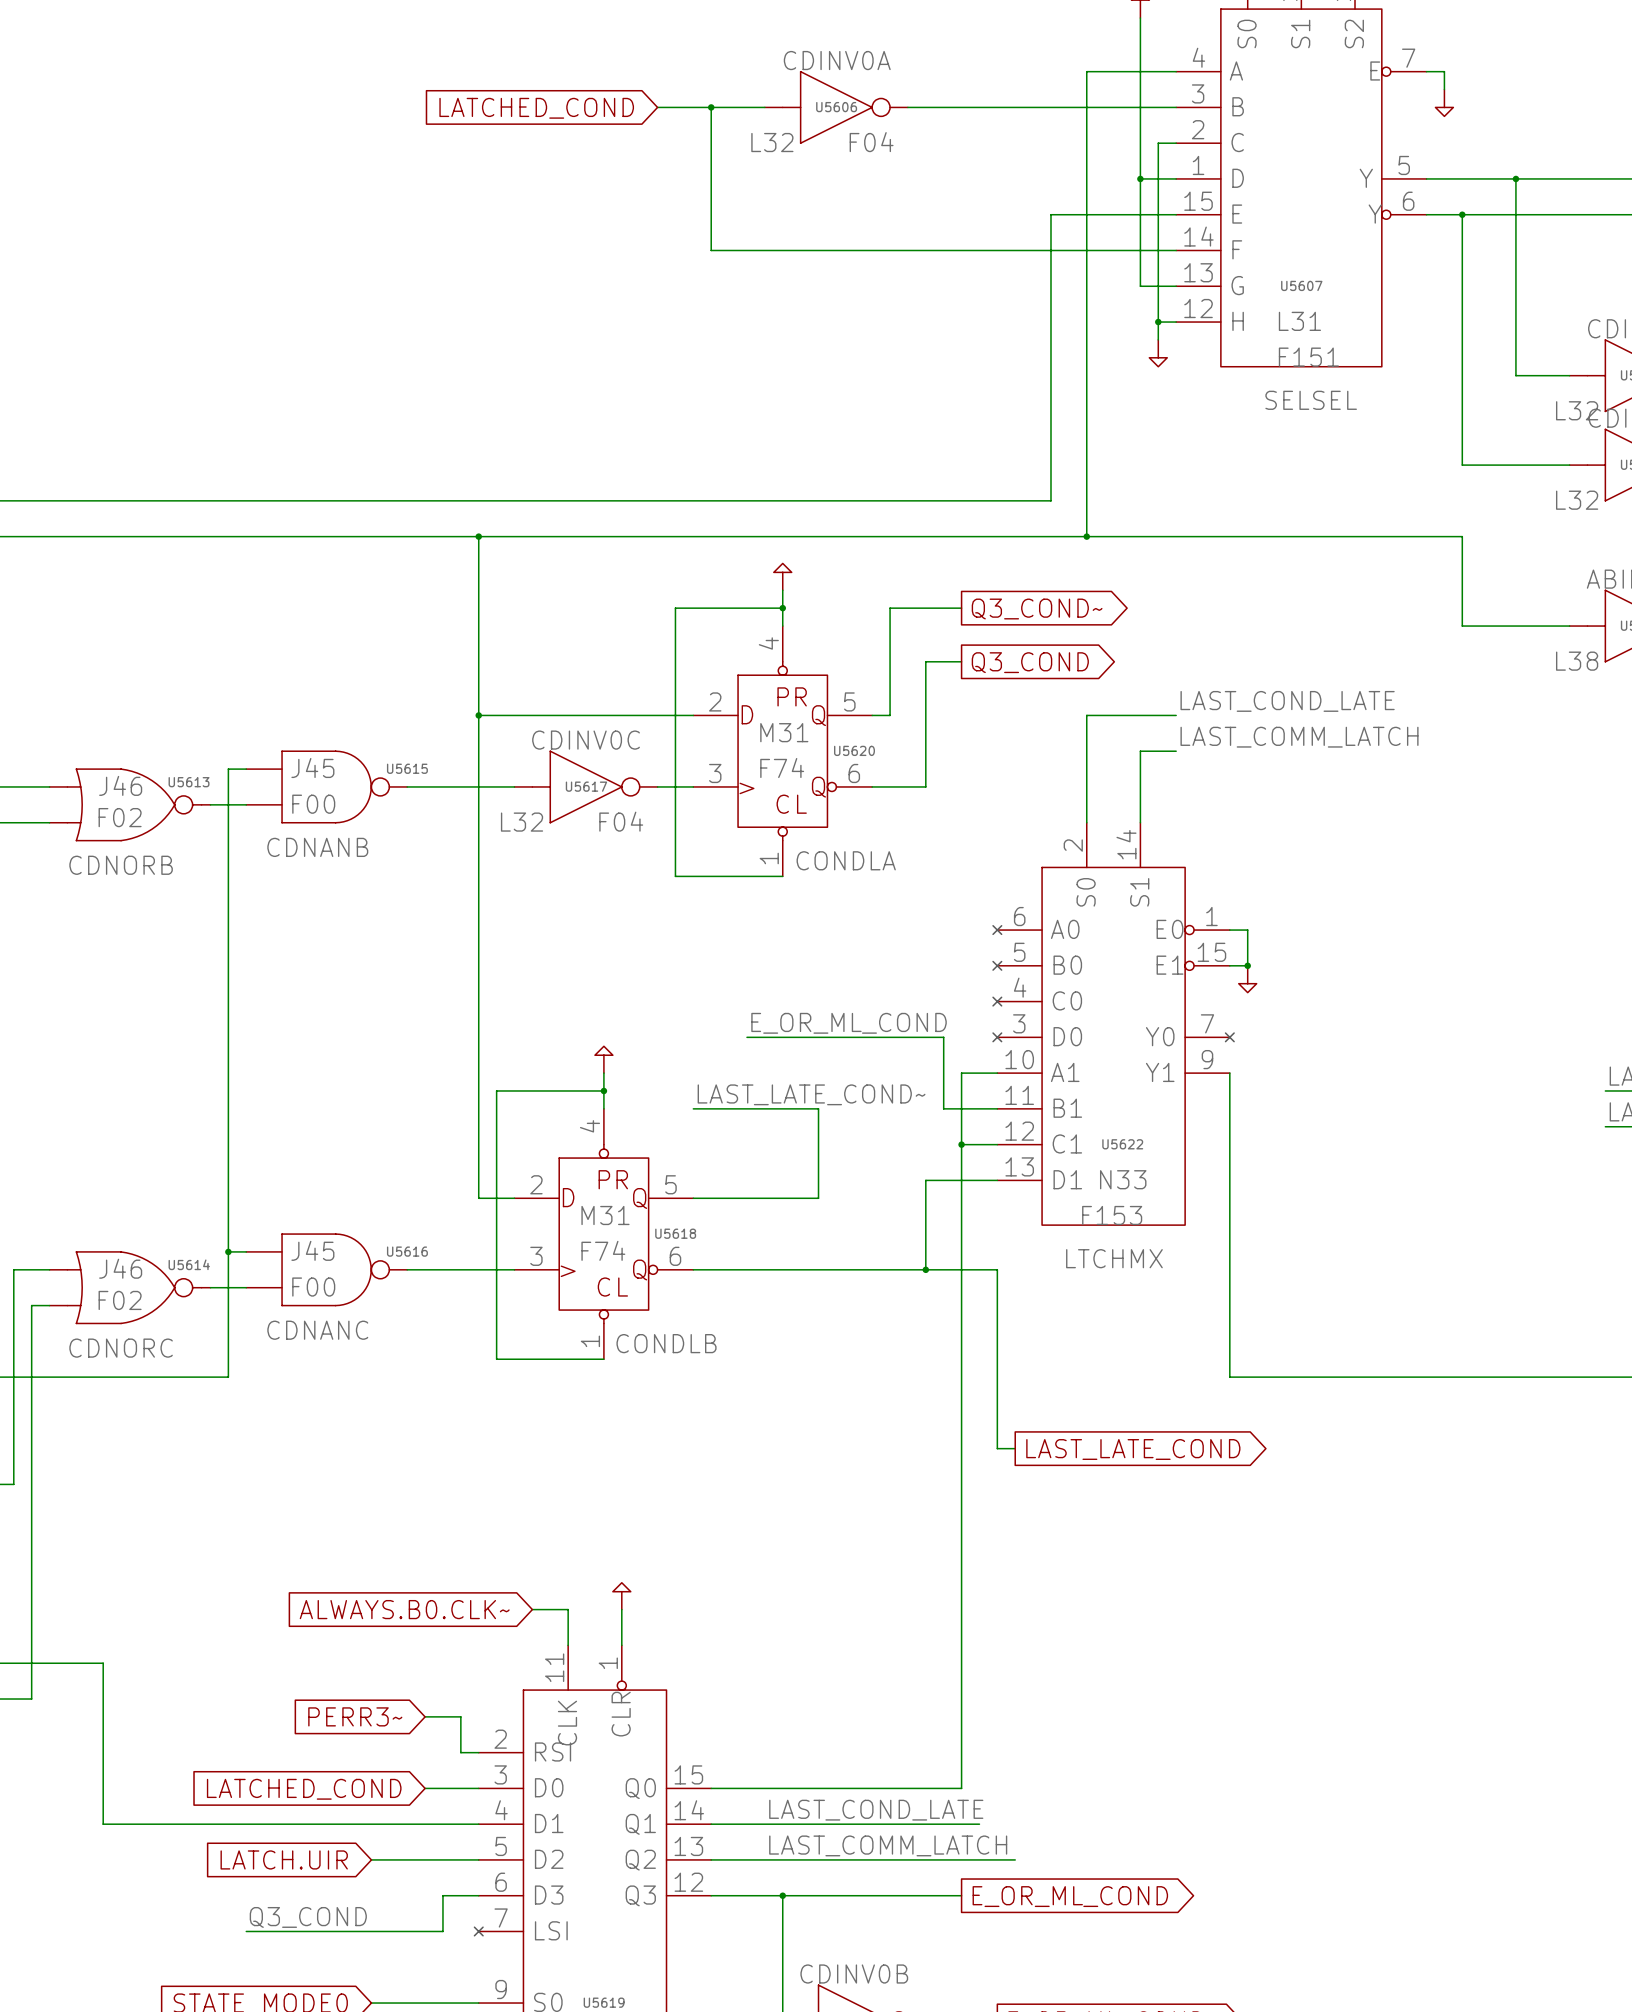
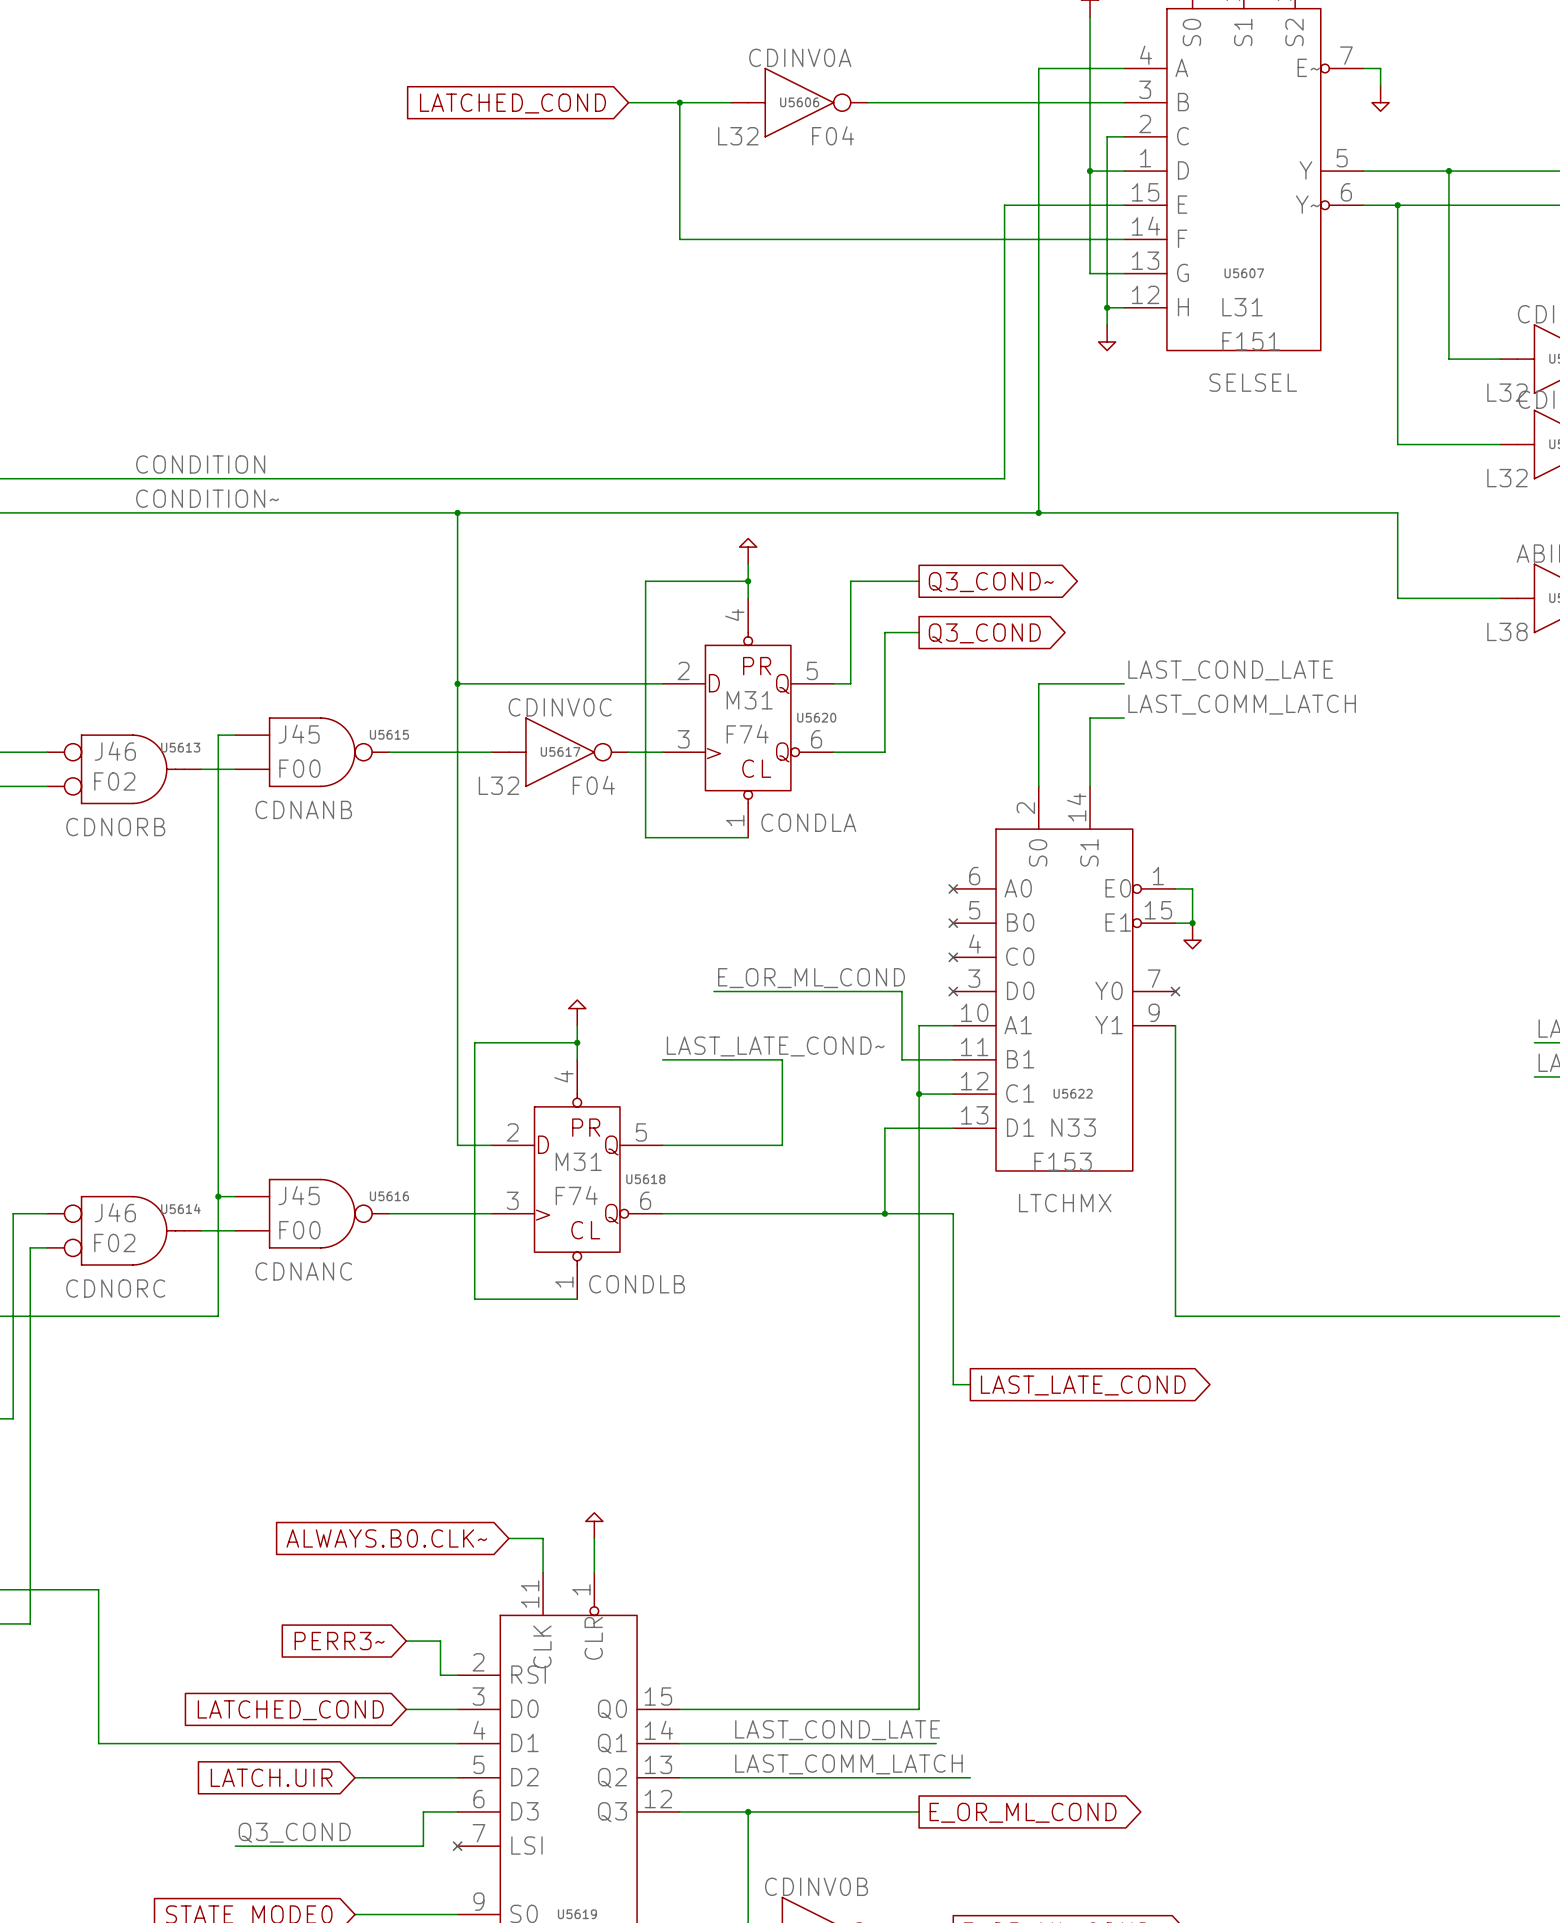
U5607 pin name: E (1375, 71) -> E~ (1308, 67)
U5607 pin name: Y (1375, 214) -> Y~ (1307, 204)
label: none -> CONDITION (200, 464)
label: none -> CONDITION~ (207, 498)
U5613 symbol: [49, 768, 211, 842] -> [47, 734, 202, 805]
U5614 symbol: [49, 1251, 211, 1325] -> [47, 1196, 202, 1266]

